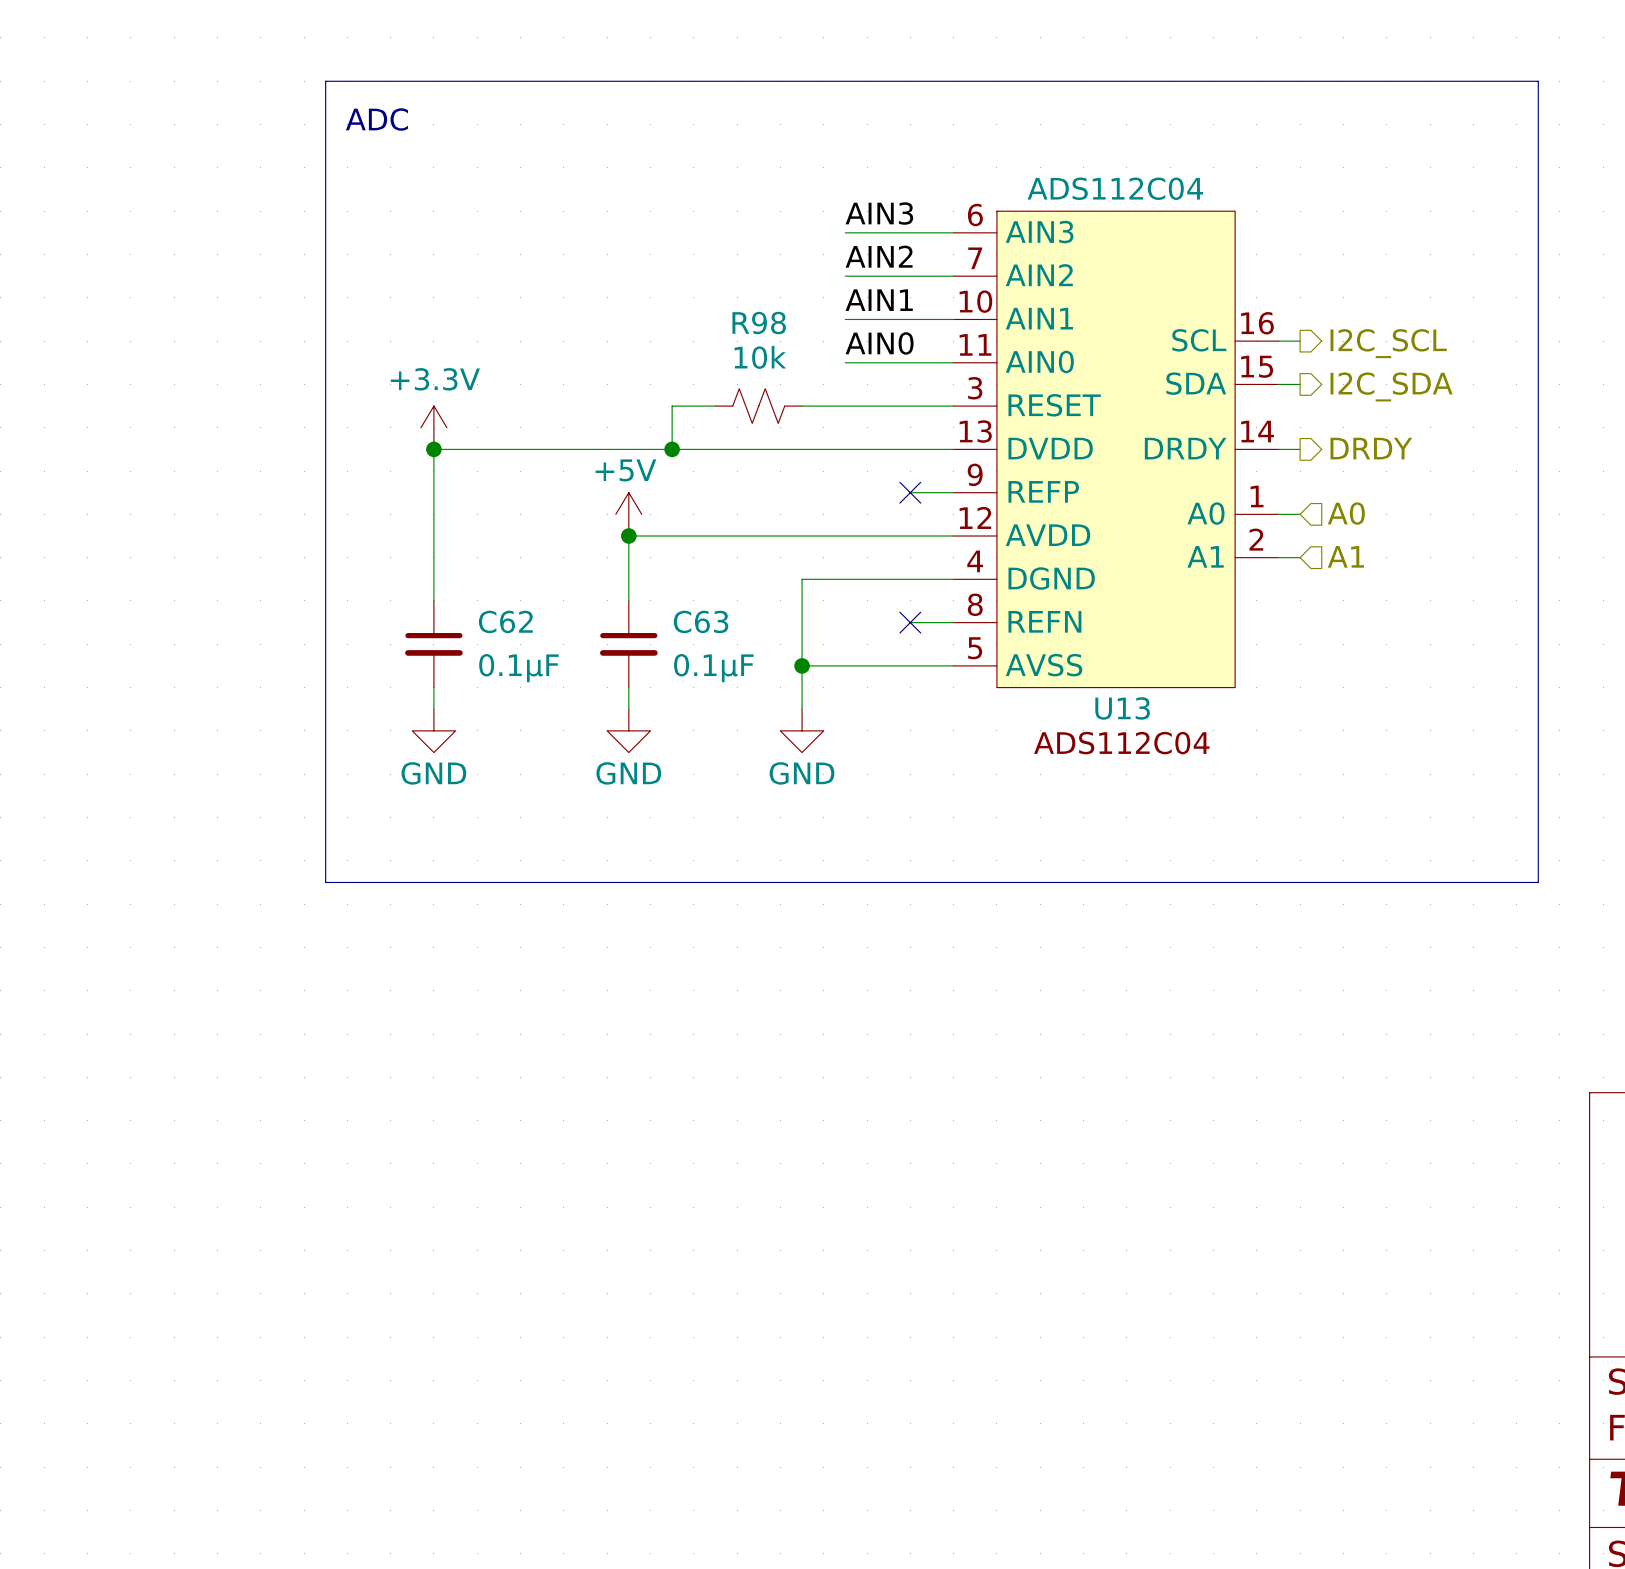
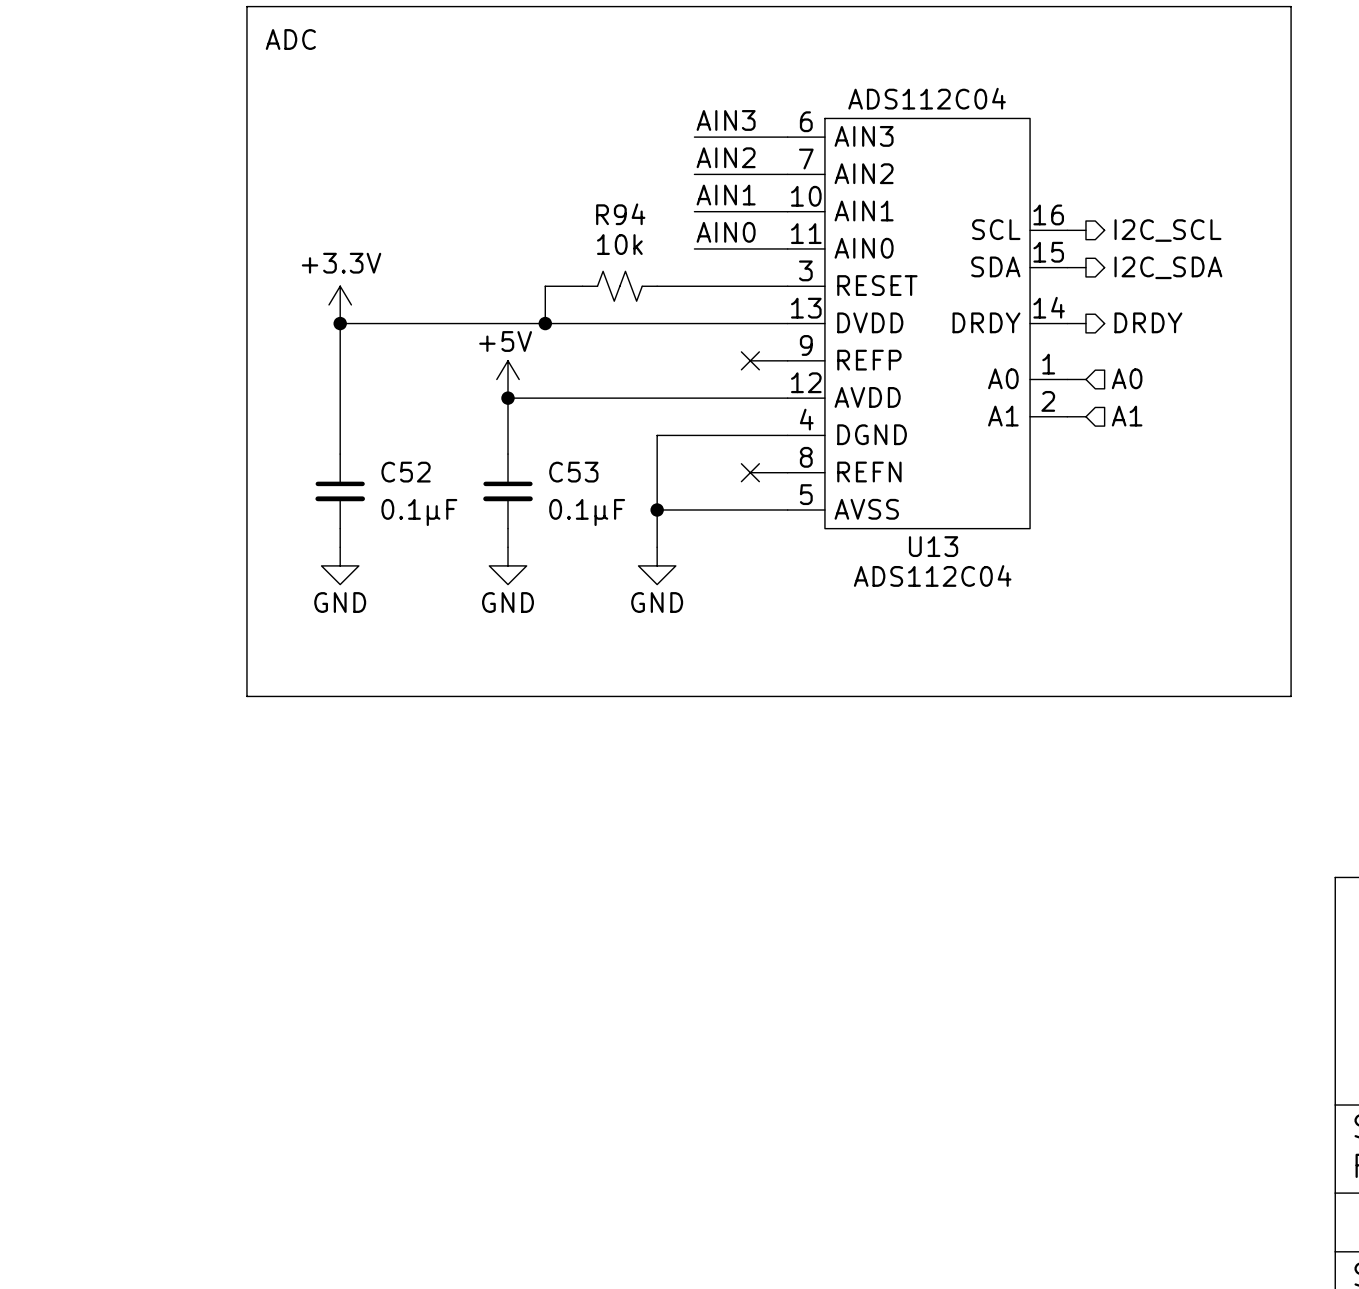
R98 name: R98 (759, 323) -> R94 (620, 214)
C62 name: C62 (505, 621) -> C52 (406, 472)
C63 name: C63 (701, 621) -> C53 (573, 472)

